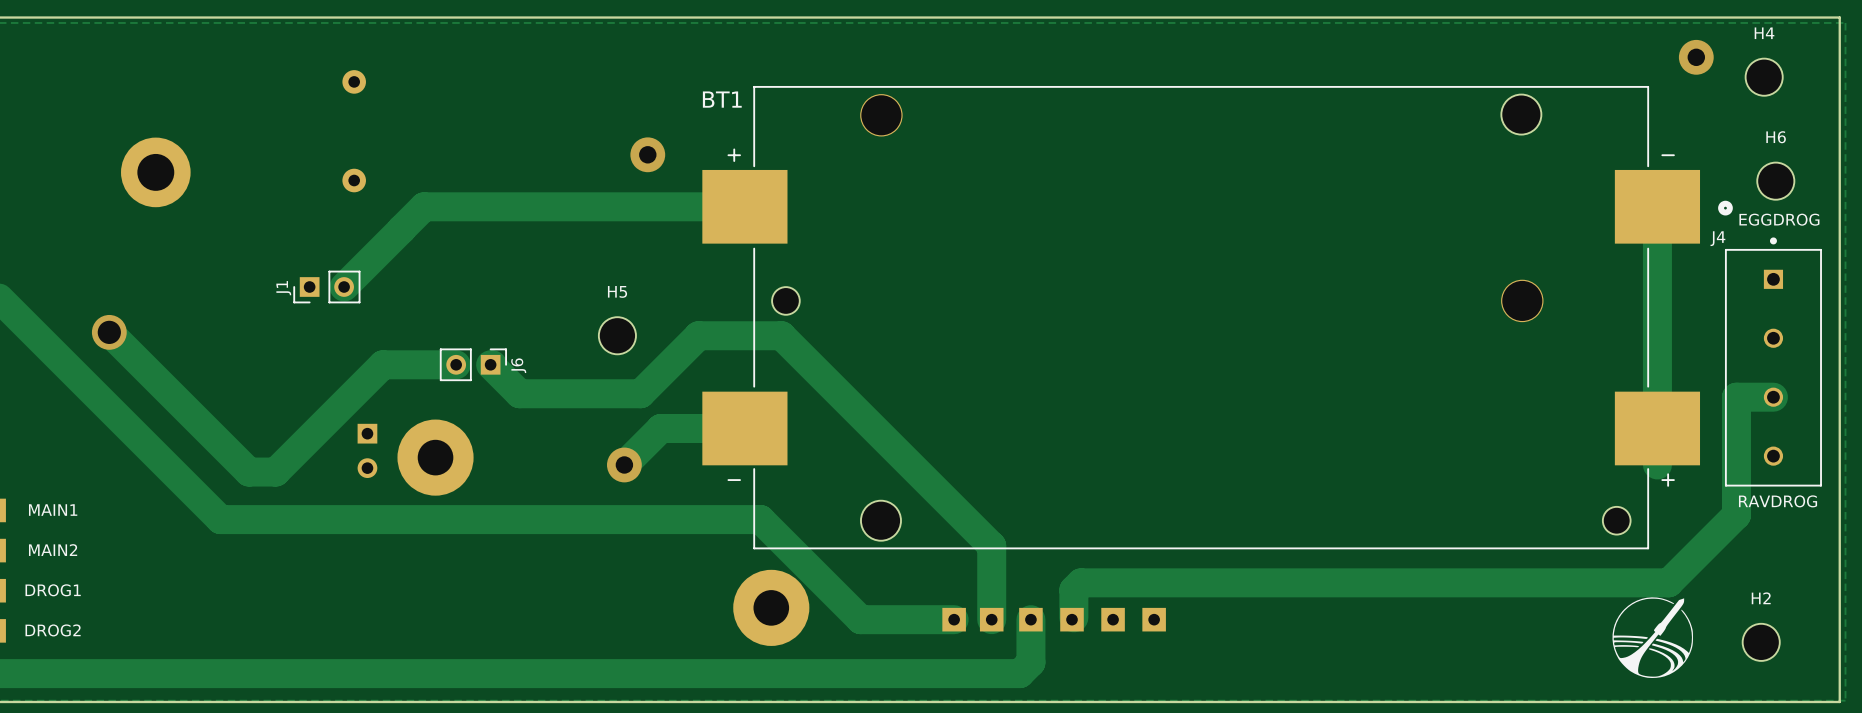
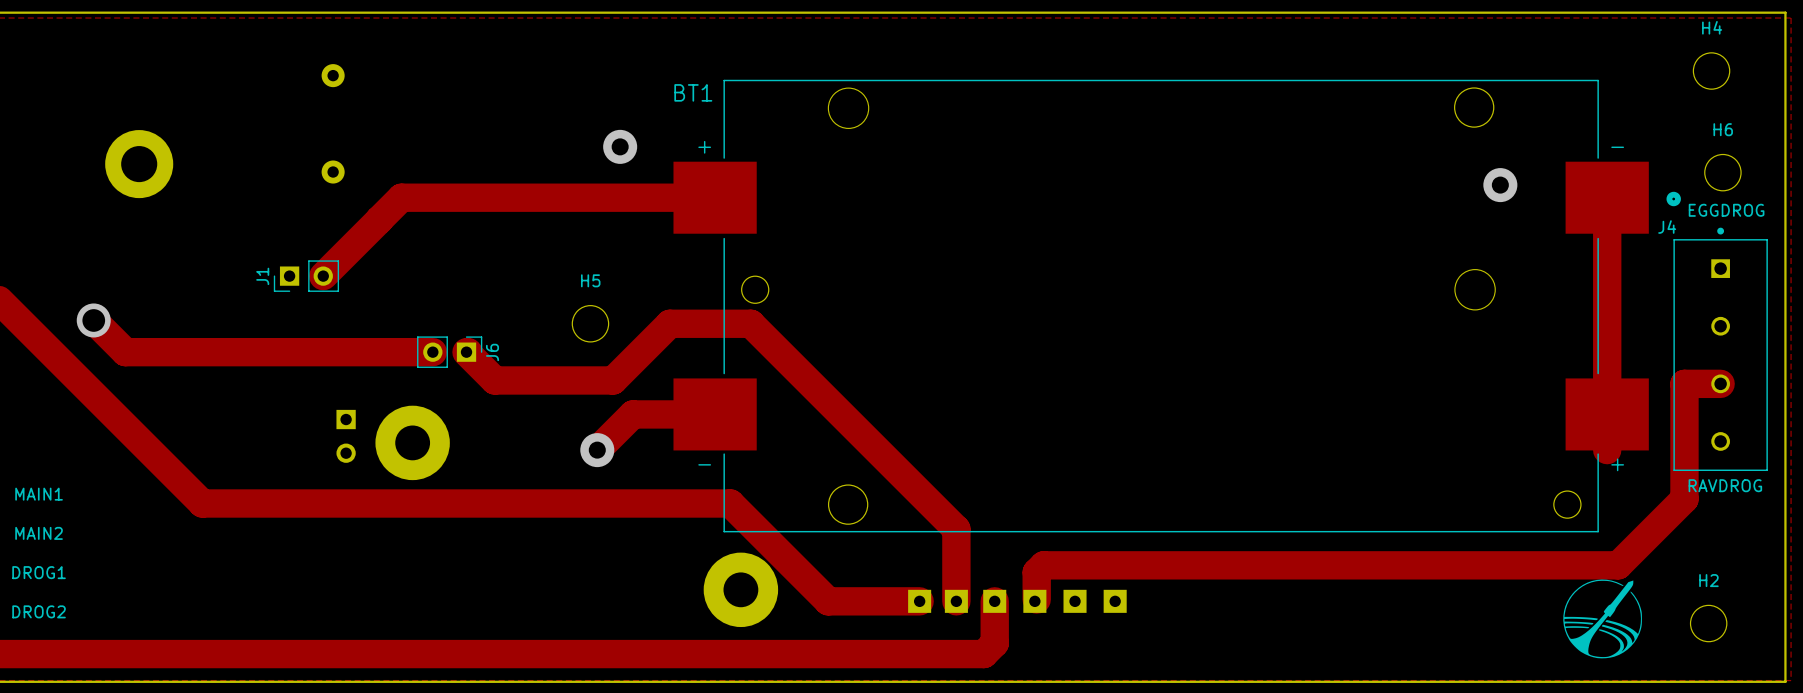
via: (1696, 57) -> none
via: none -> (1500, 185)
track: (141, 364) (249, 472) (275, 472) (382, 364) -> (125, 352) (361, 352)

